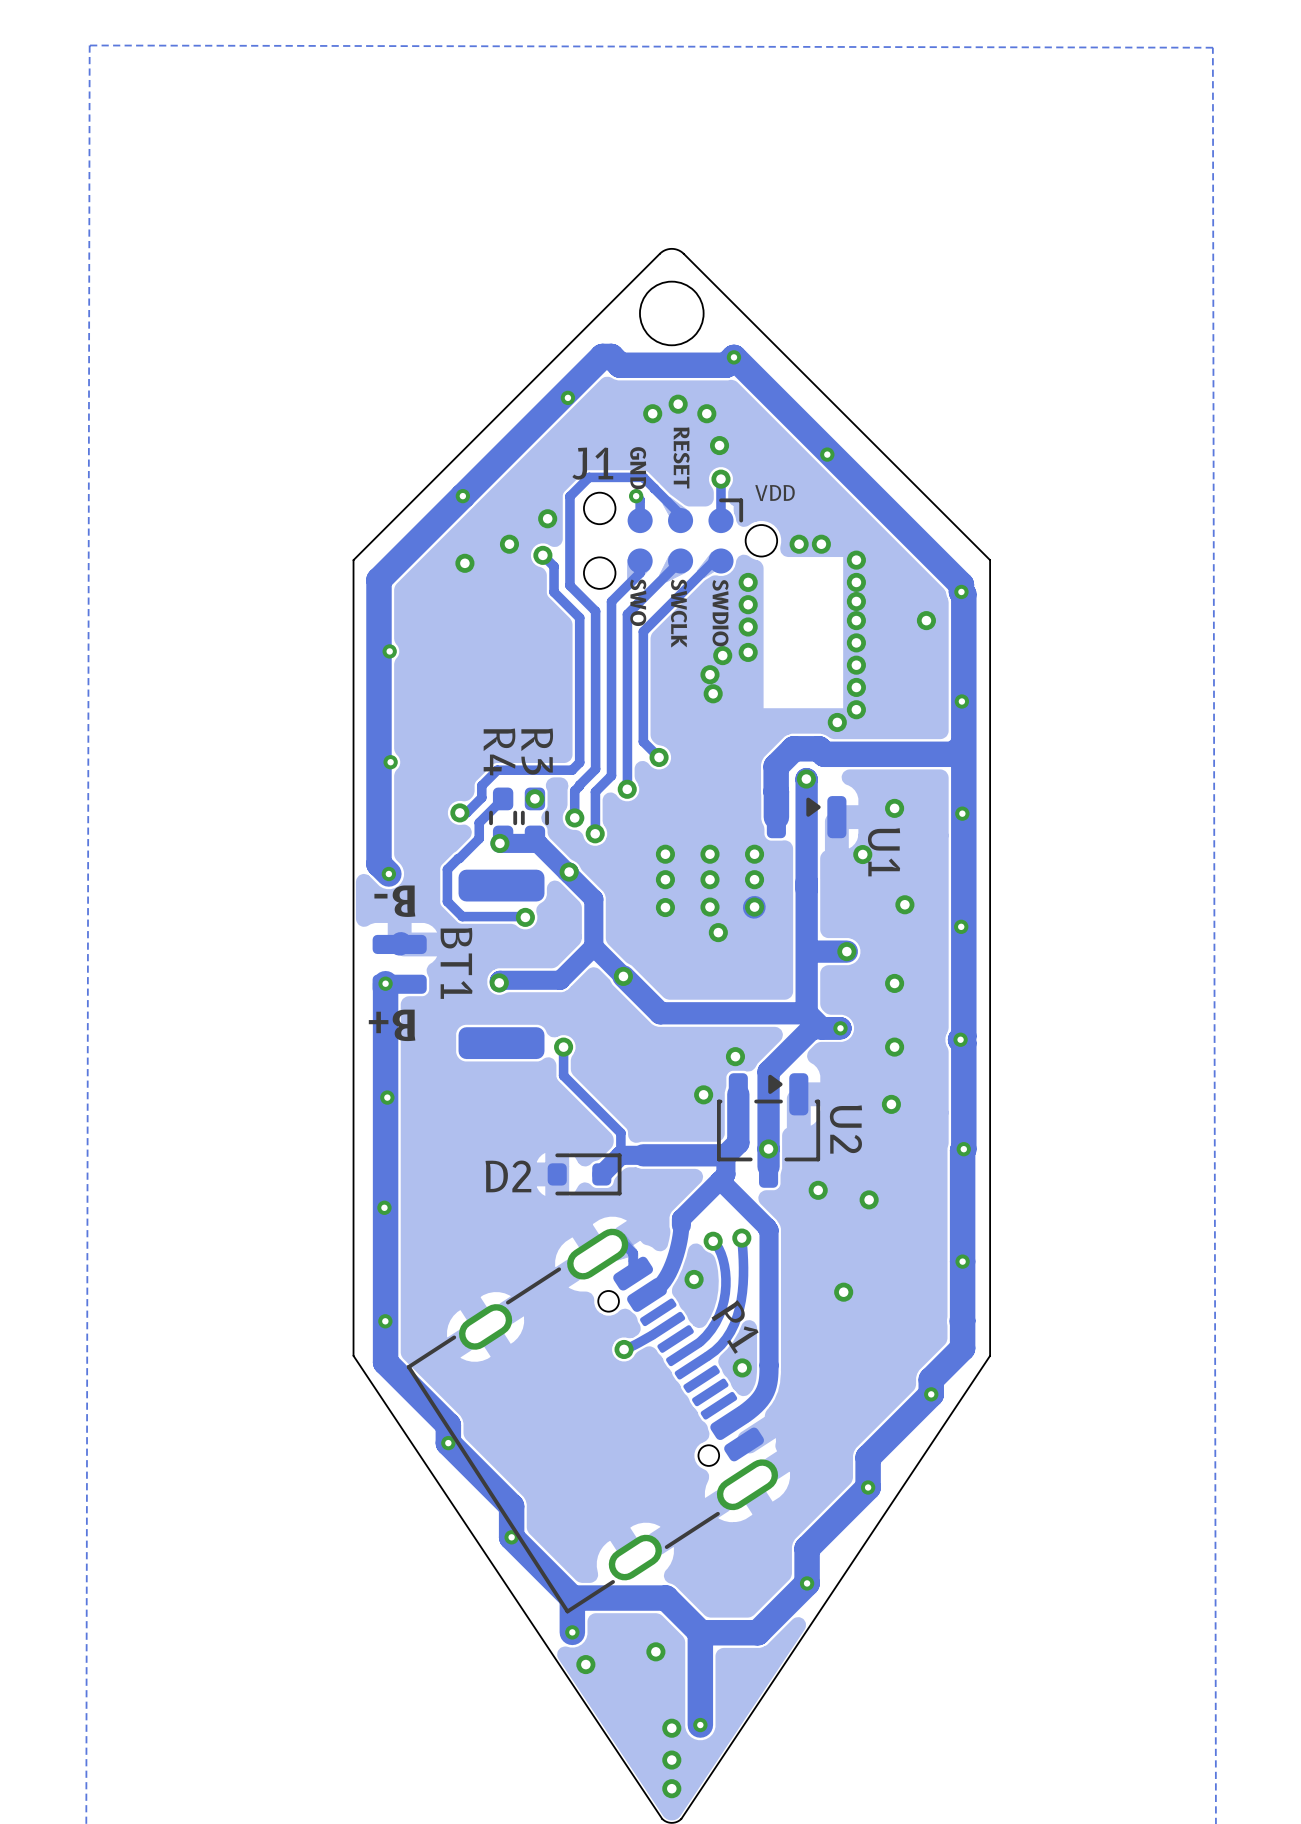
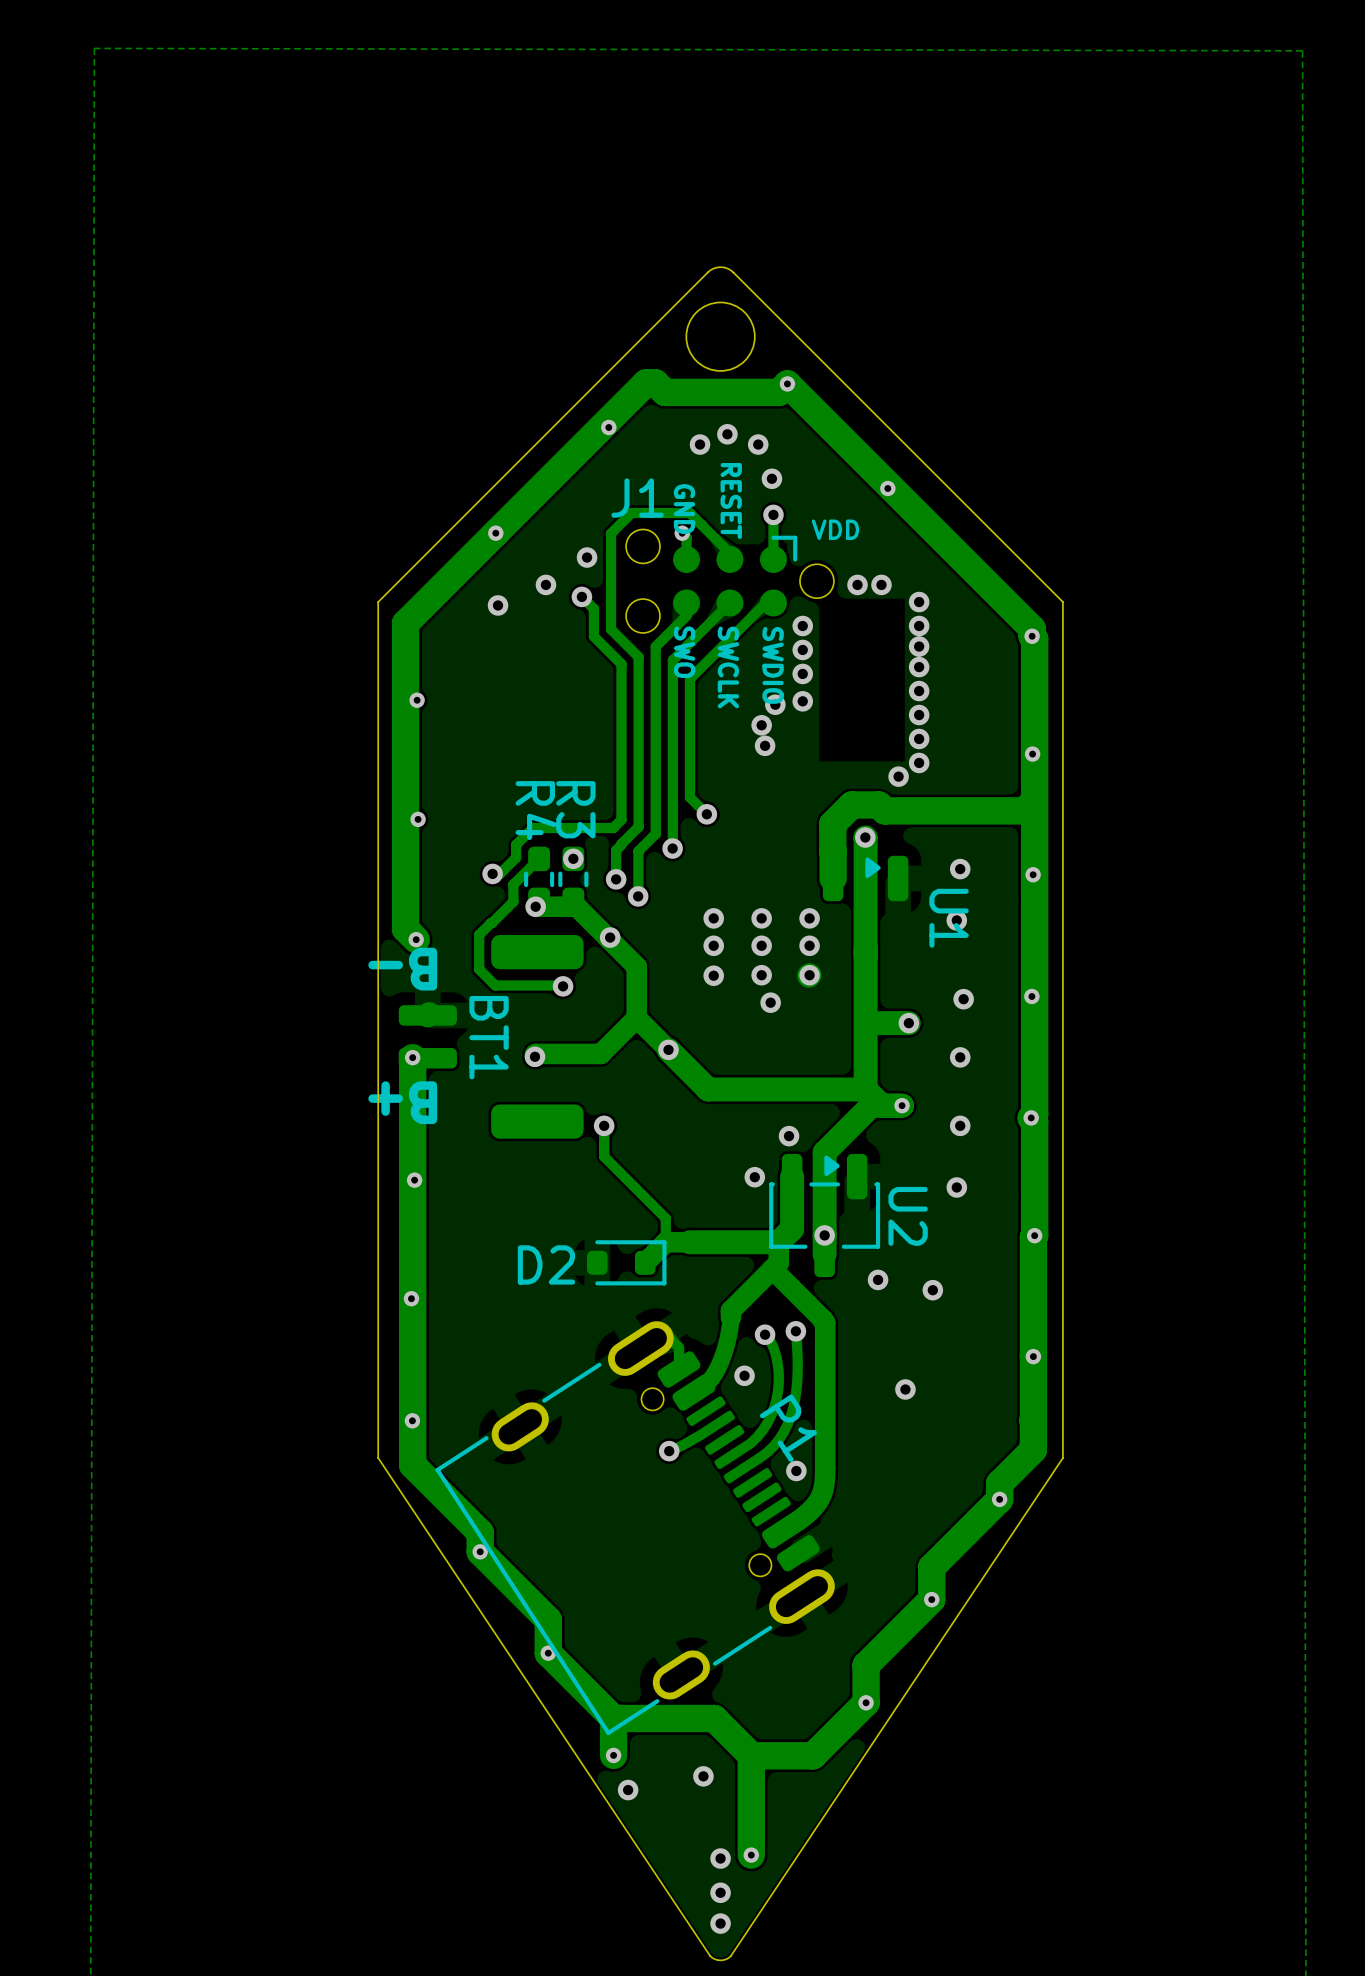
via: (926, 620) -> none
via: (862, 854) -> none
via: none -> (956, 920)
via: (904, 904) -> none
via: none -> (963, 999)

